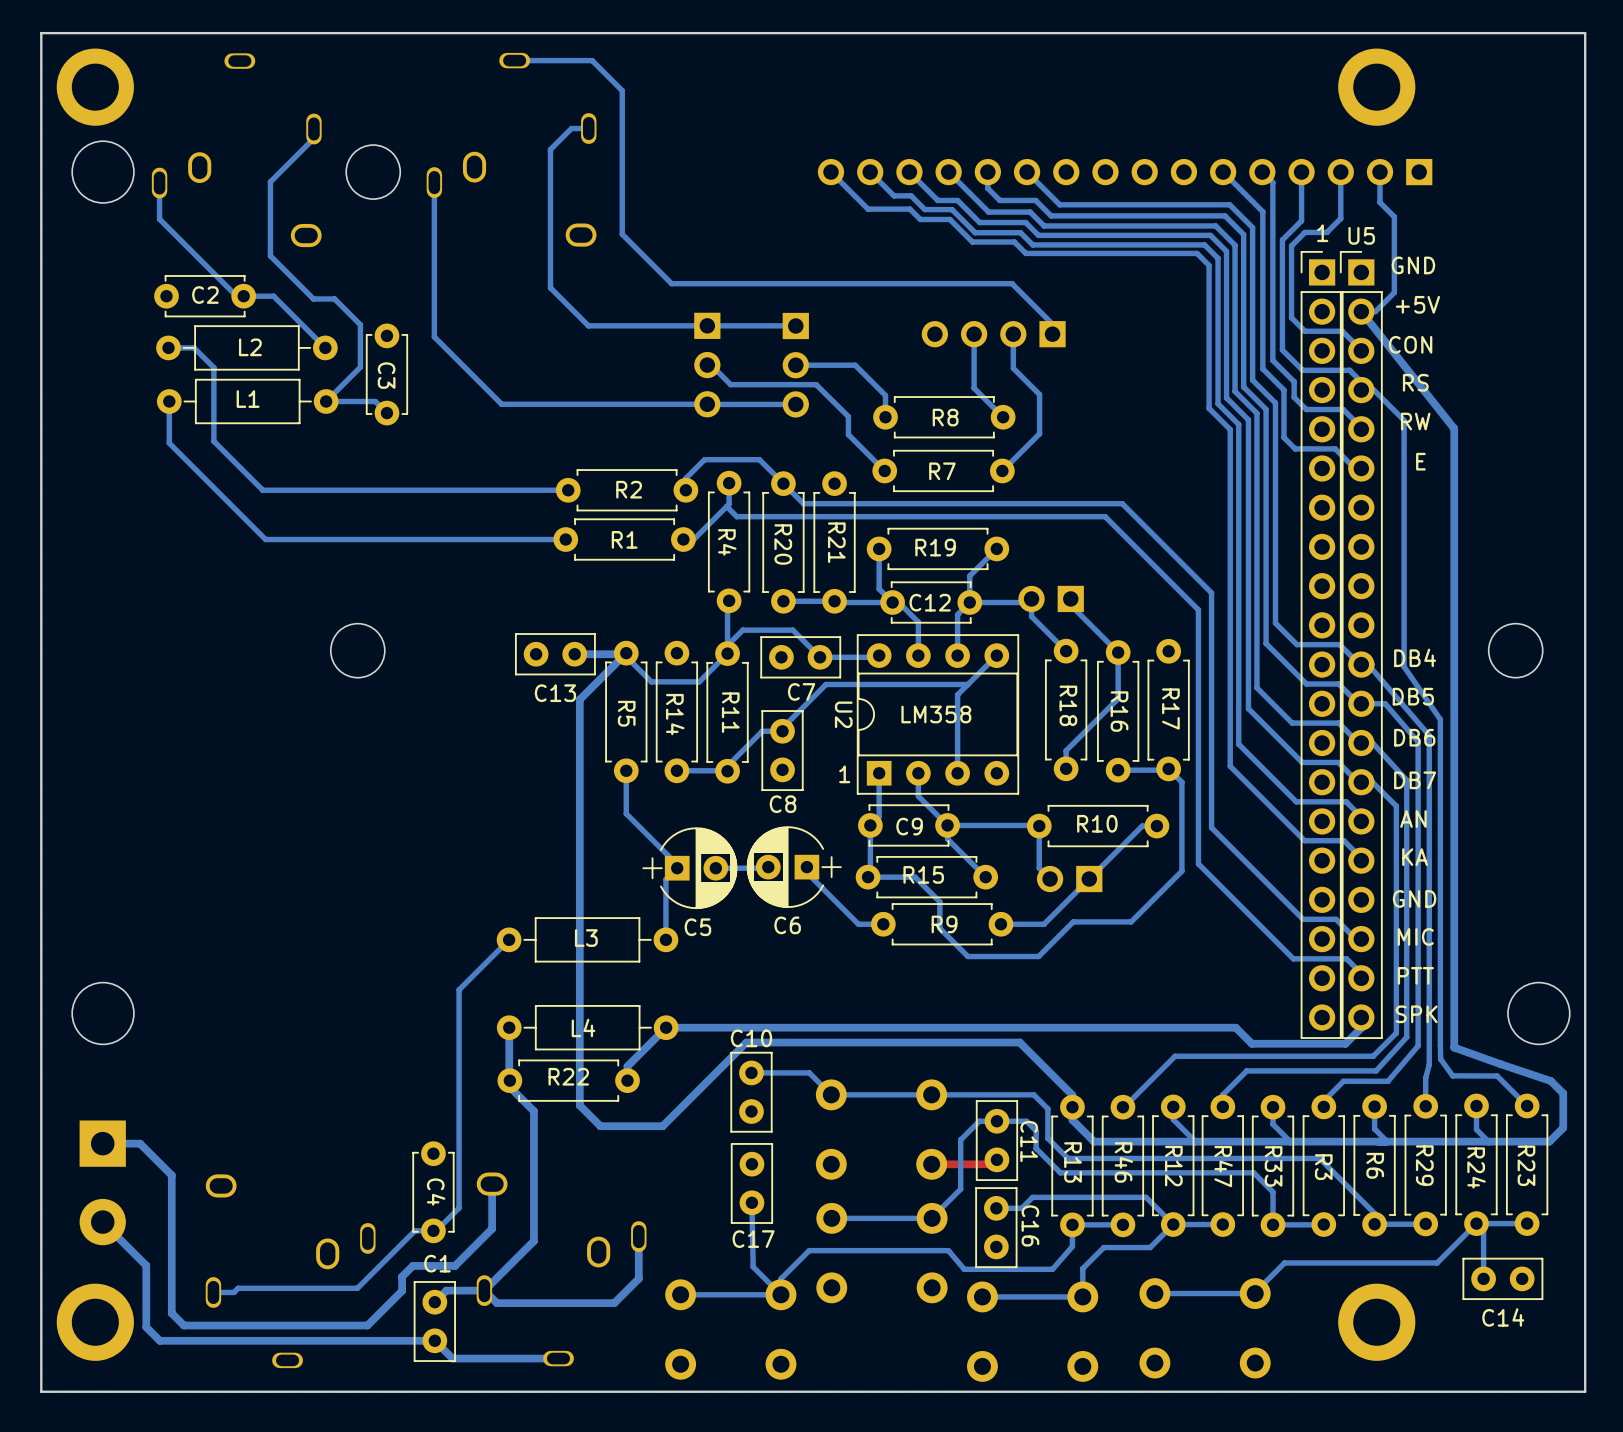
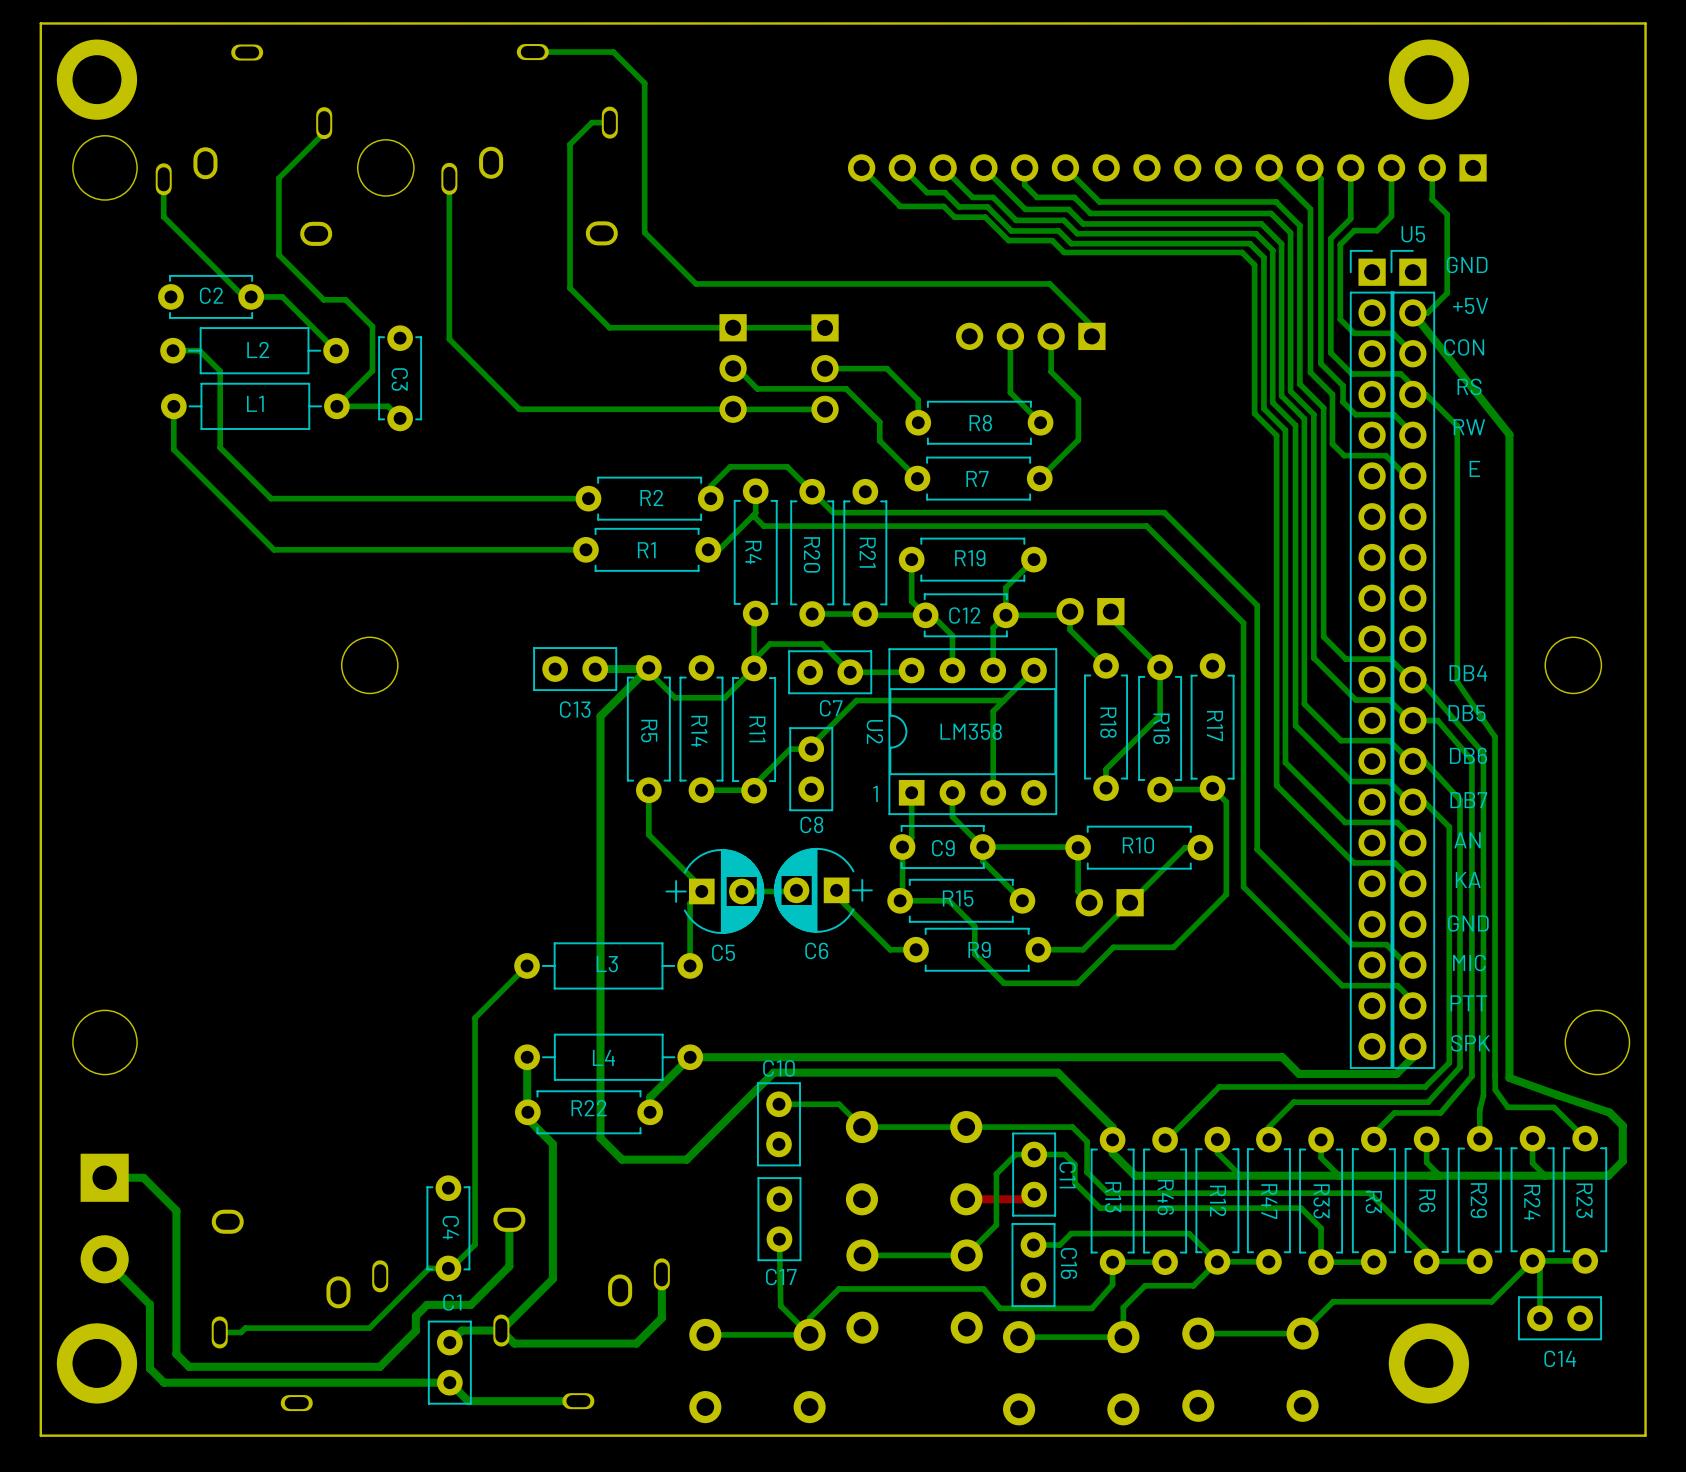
text: 1 (1322, 233) -> none

